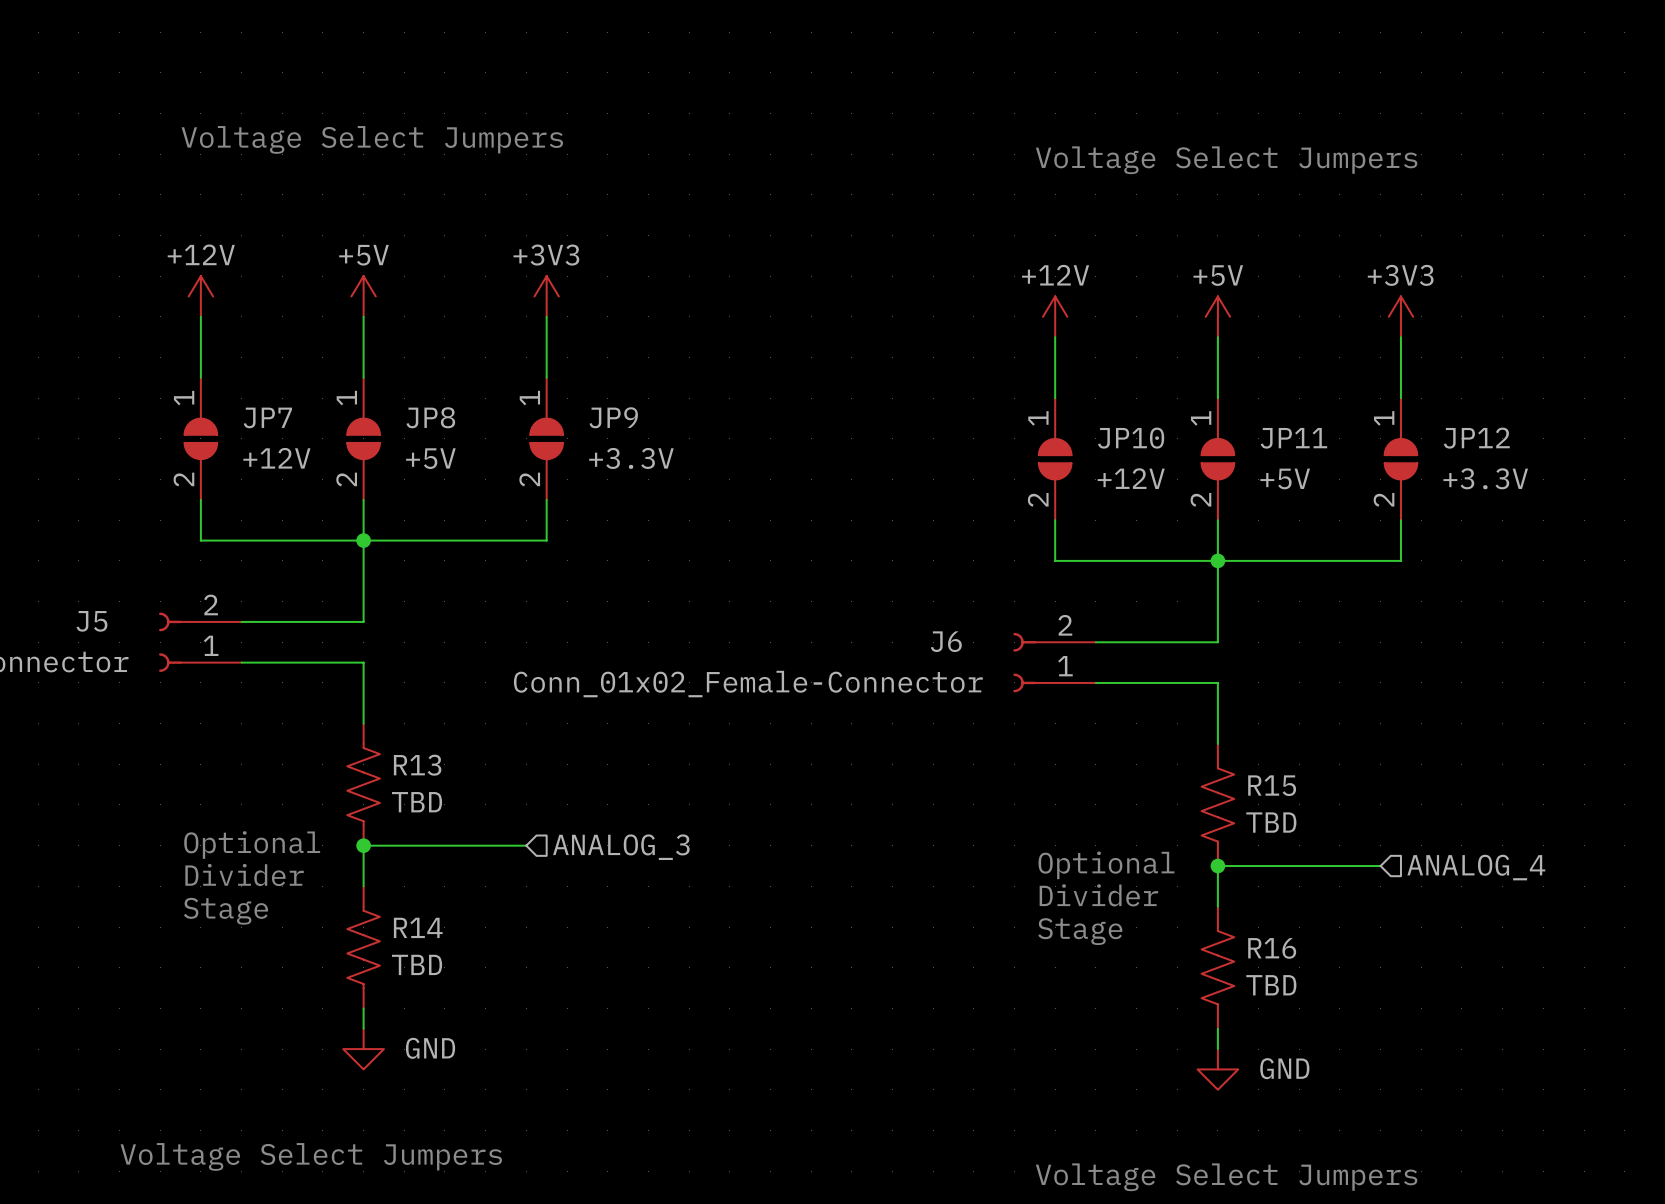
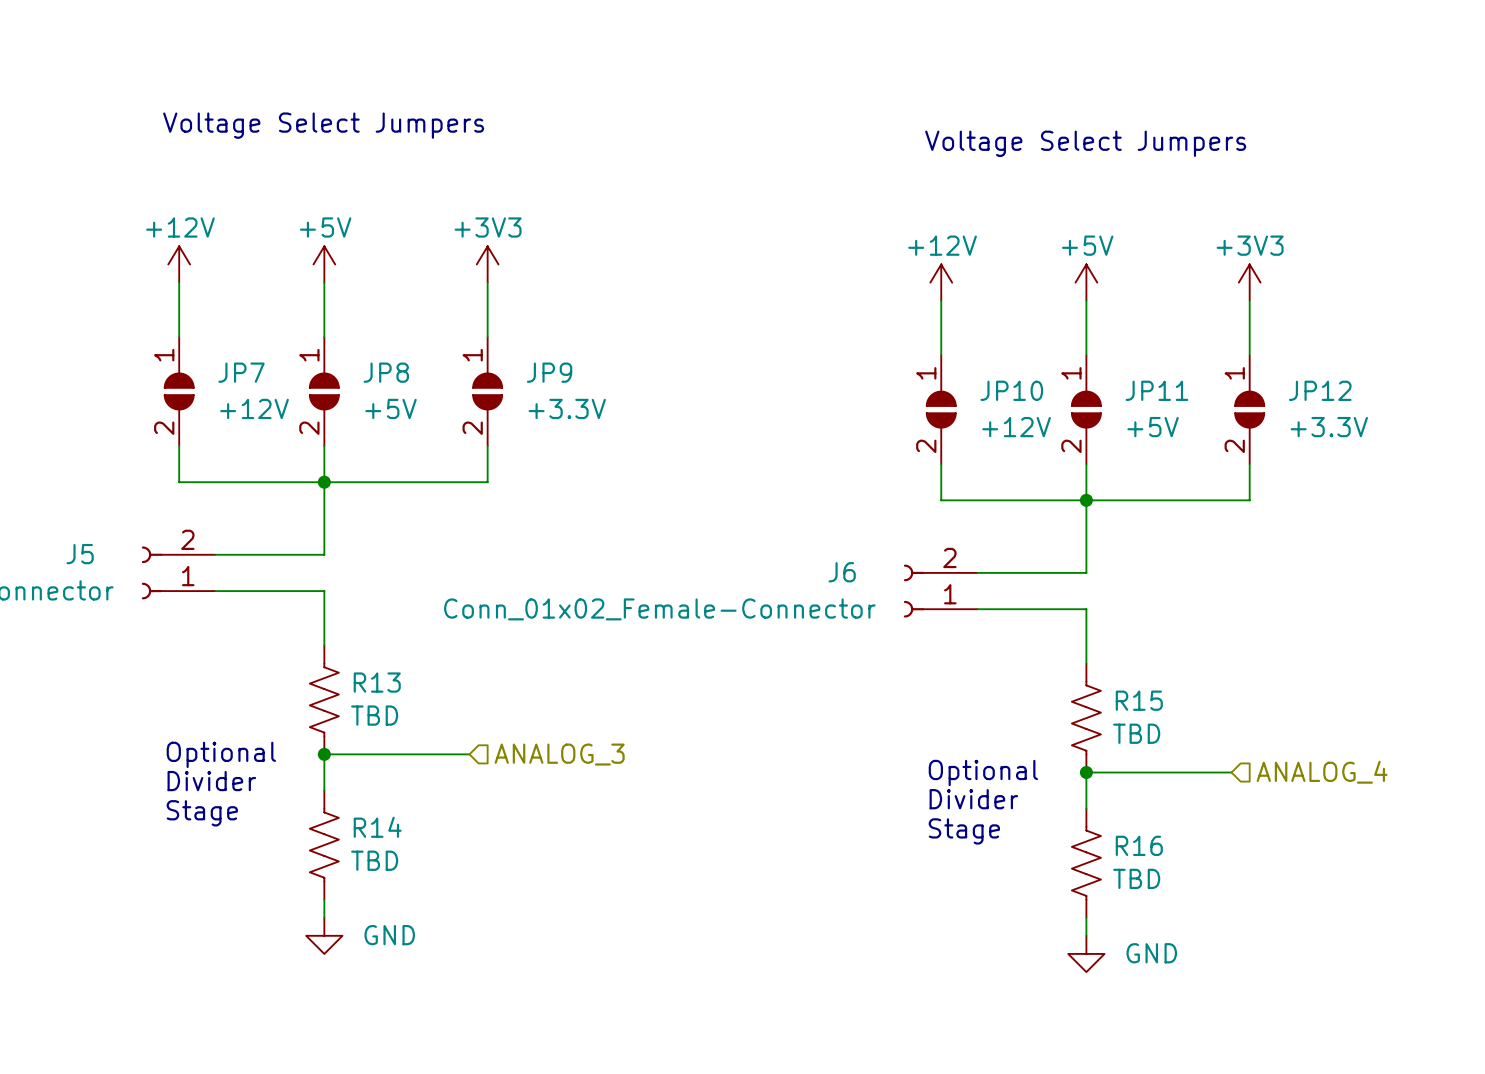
text: Voltage Select Jumpers (311, 1156) -> none
text: Voltage Select Jumpers (1226, 1177) -> none

